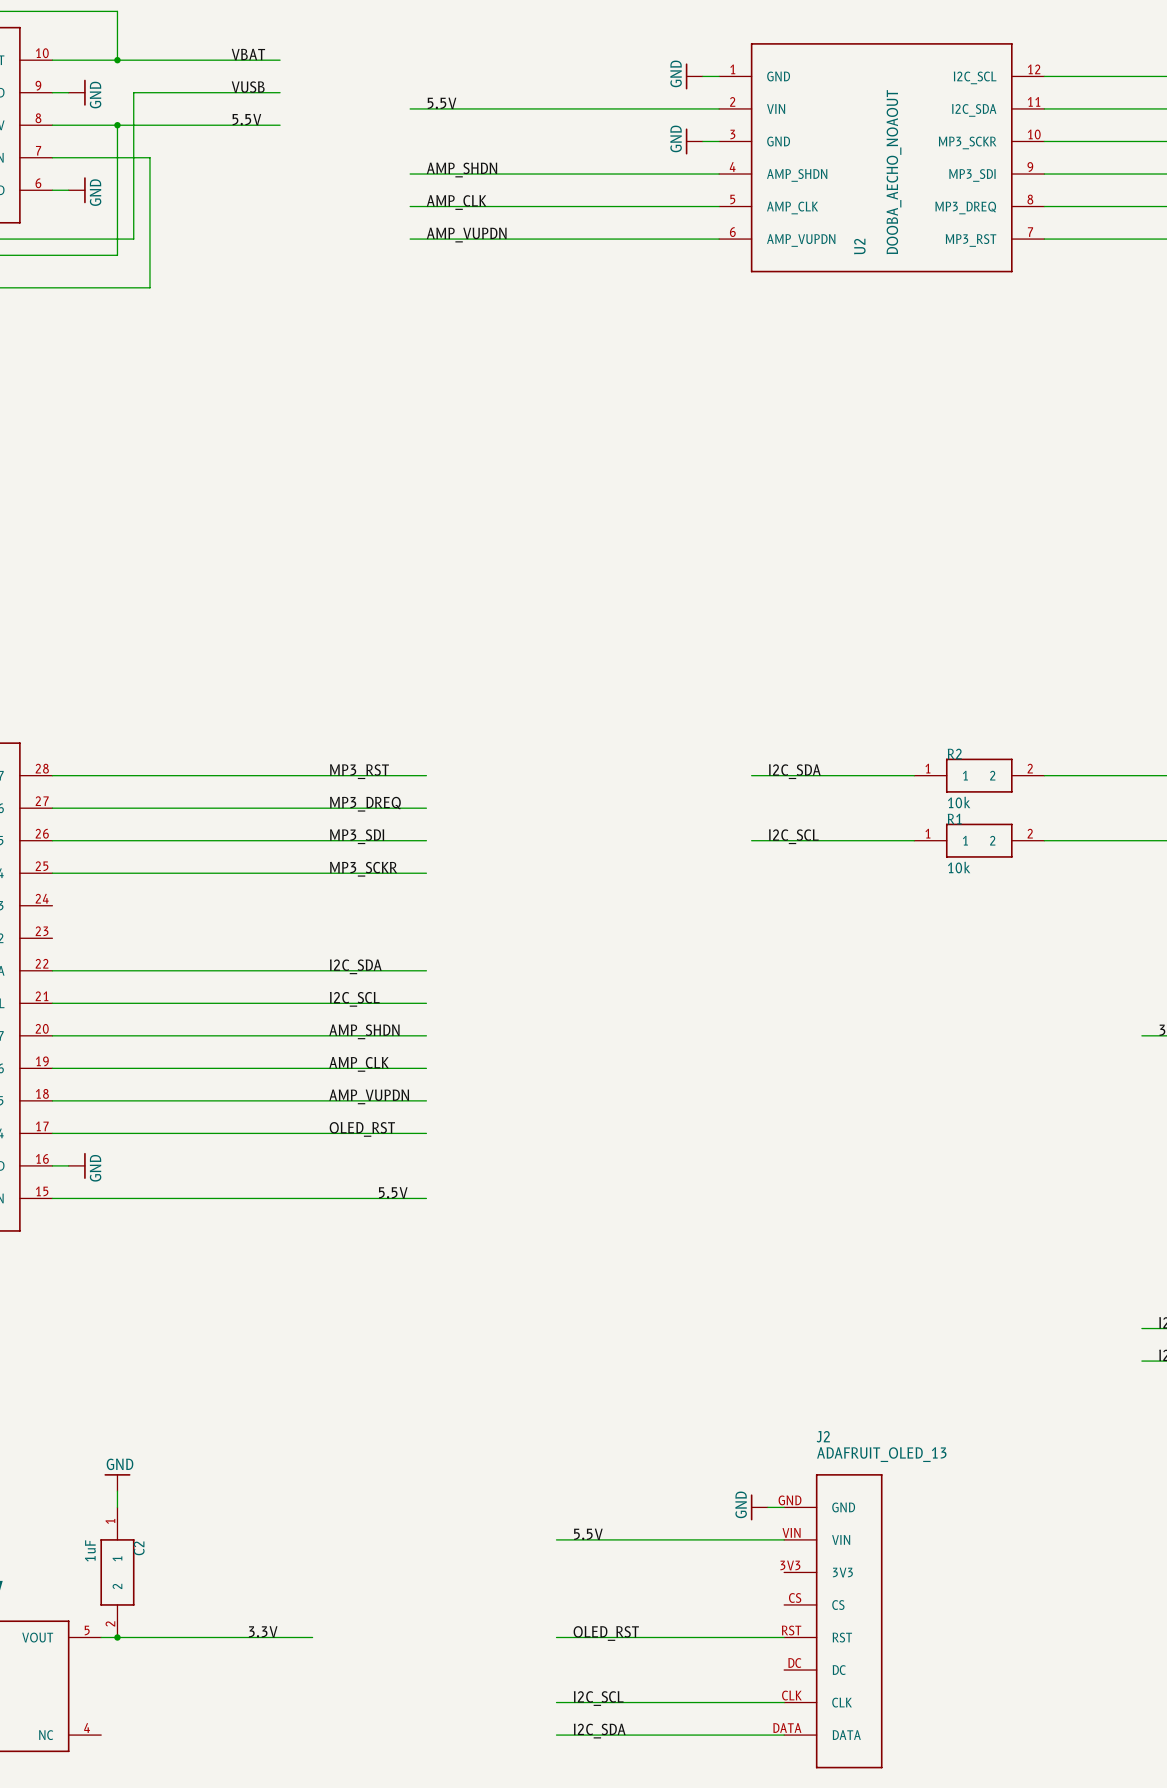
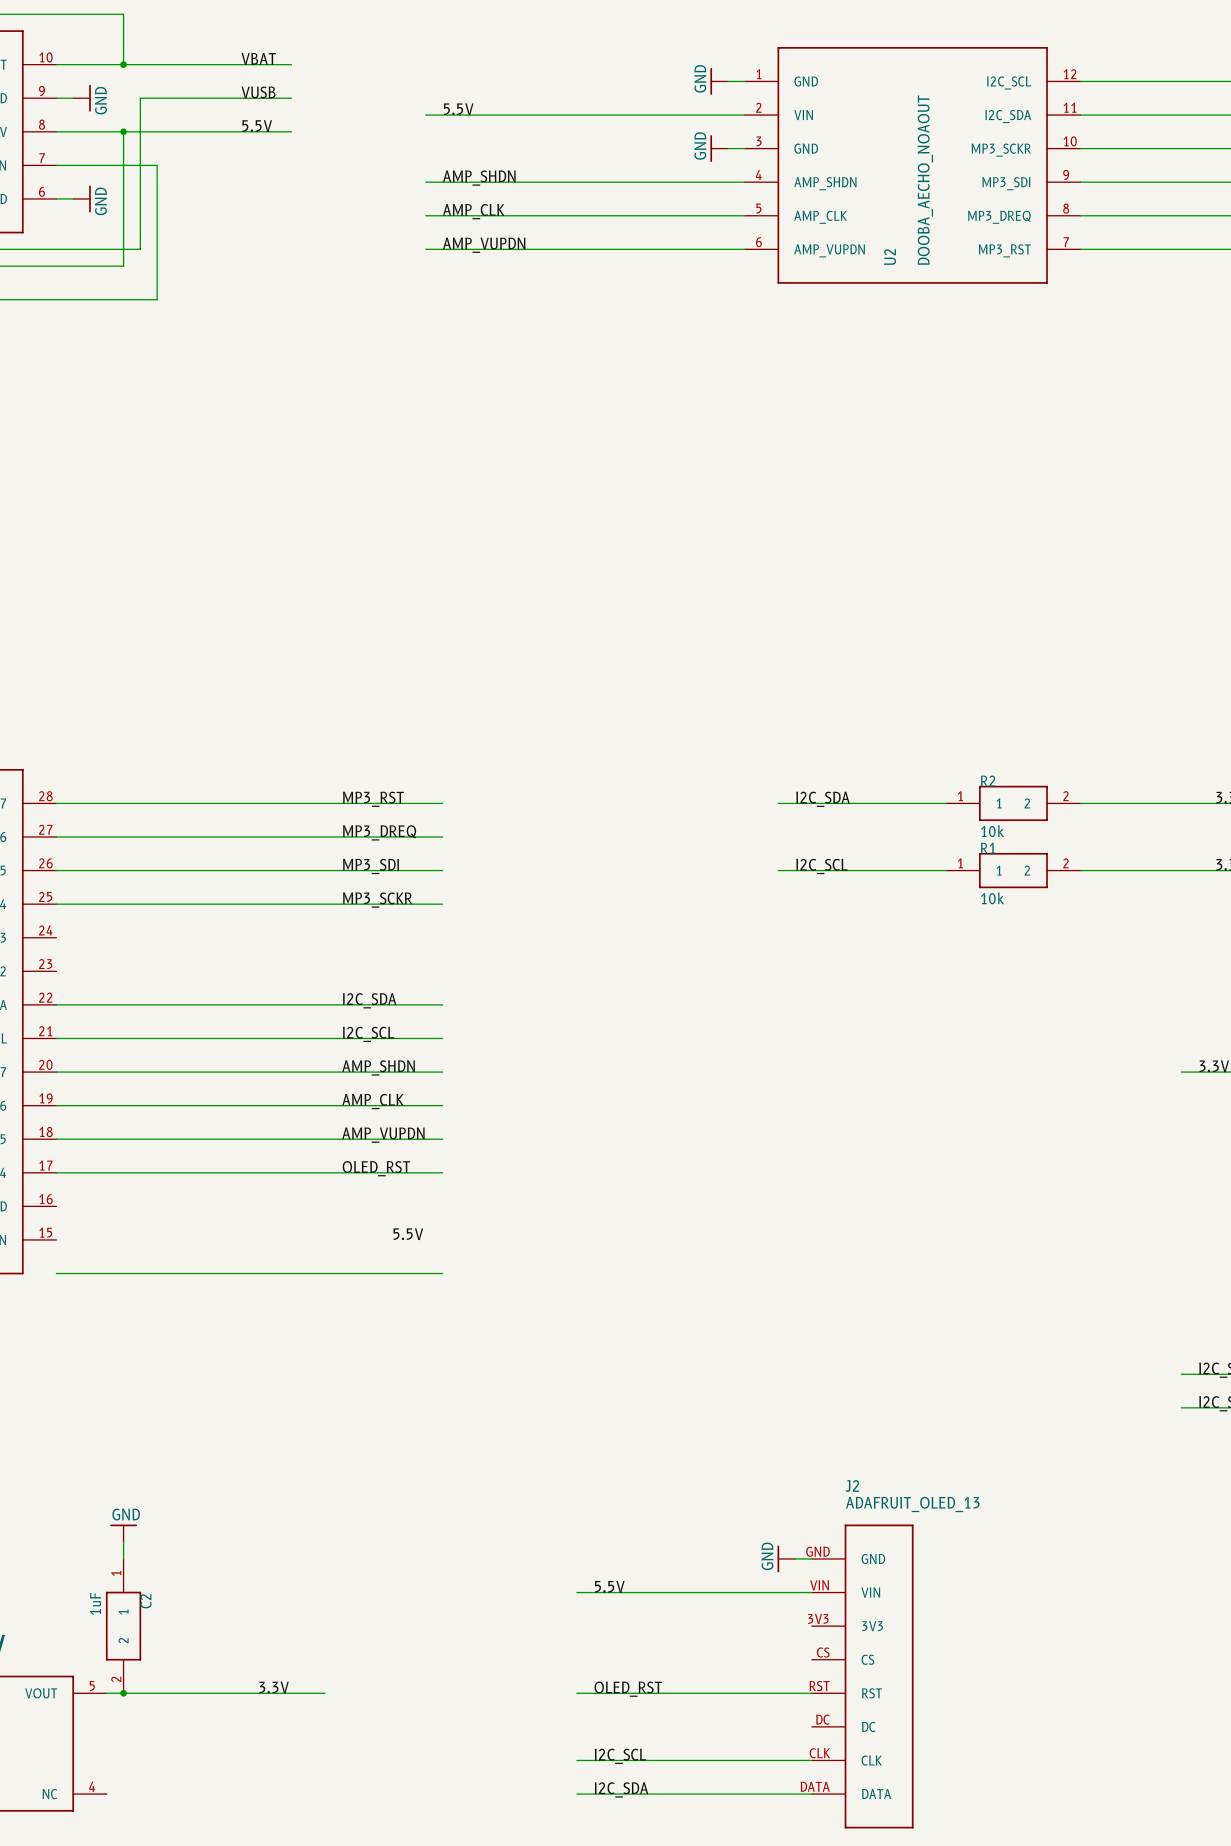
wire: (52, 1165) (68, 1165) -> none
power symbol: GND (77, 1165) -> none
wire: (52, 1198) (426, 1198) -> (56, 1273) (442, 1273)

